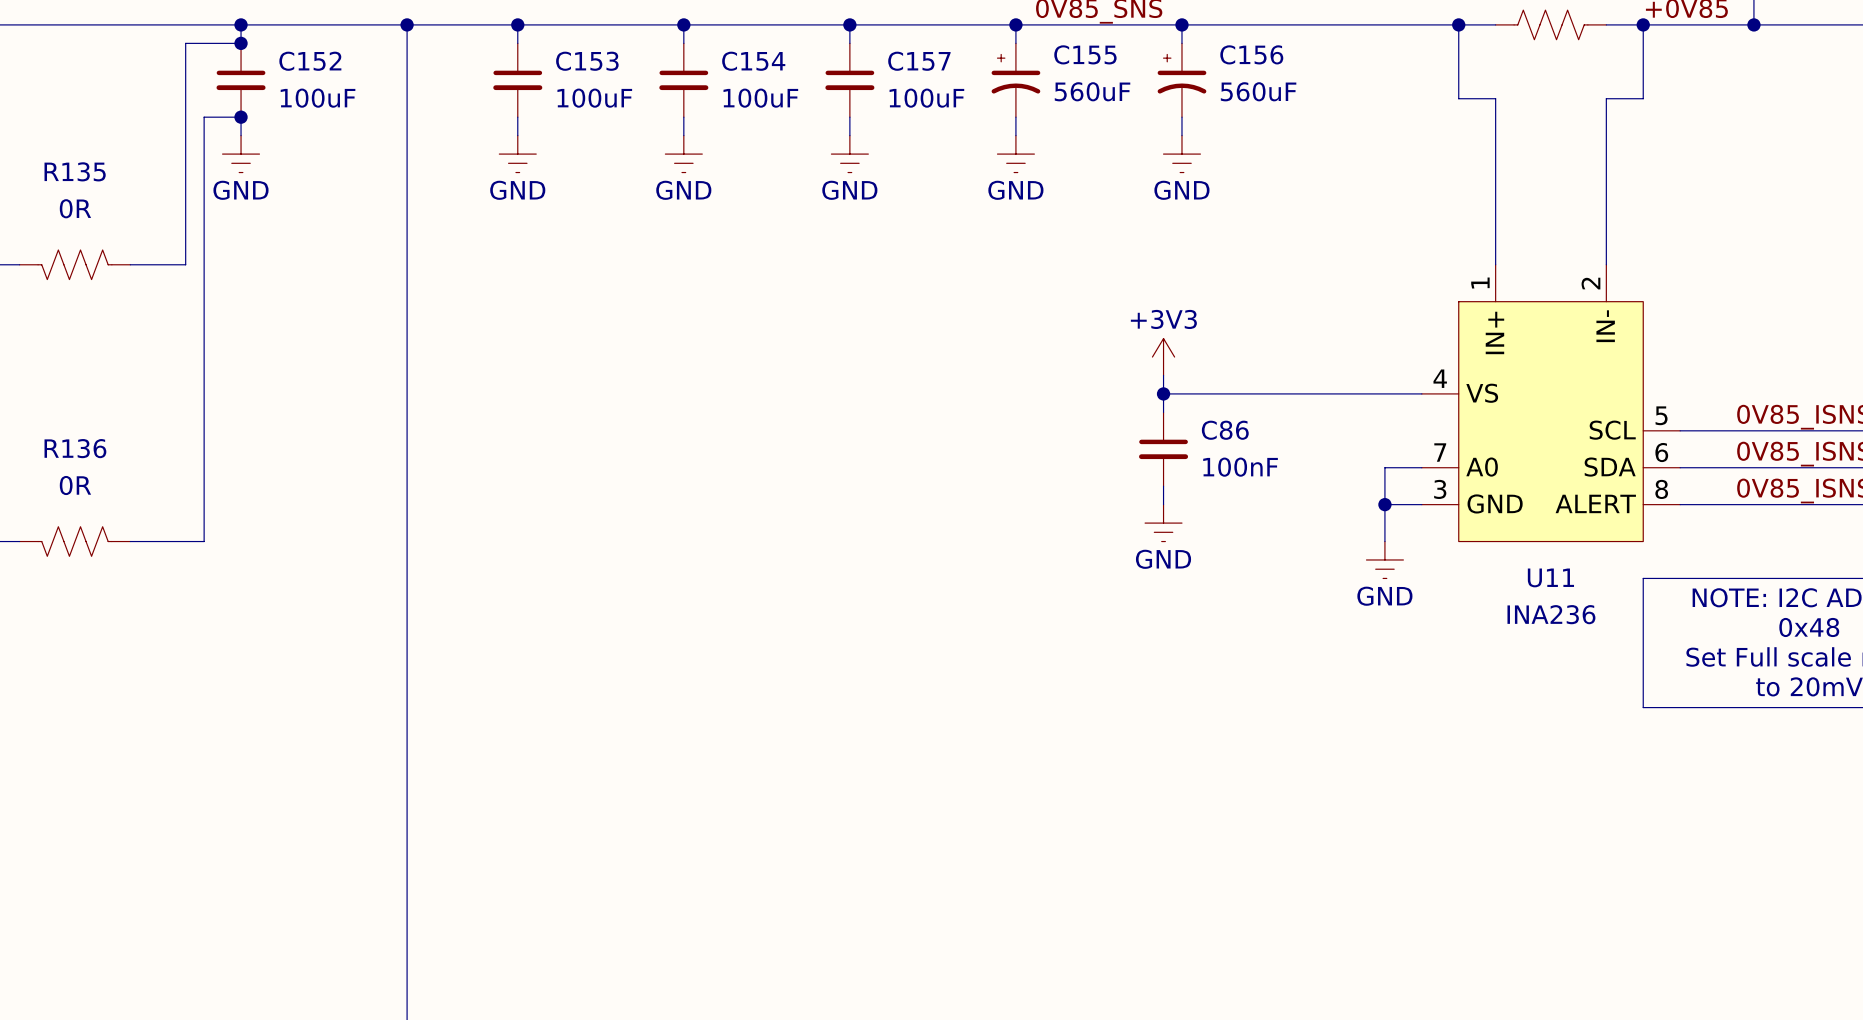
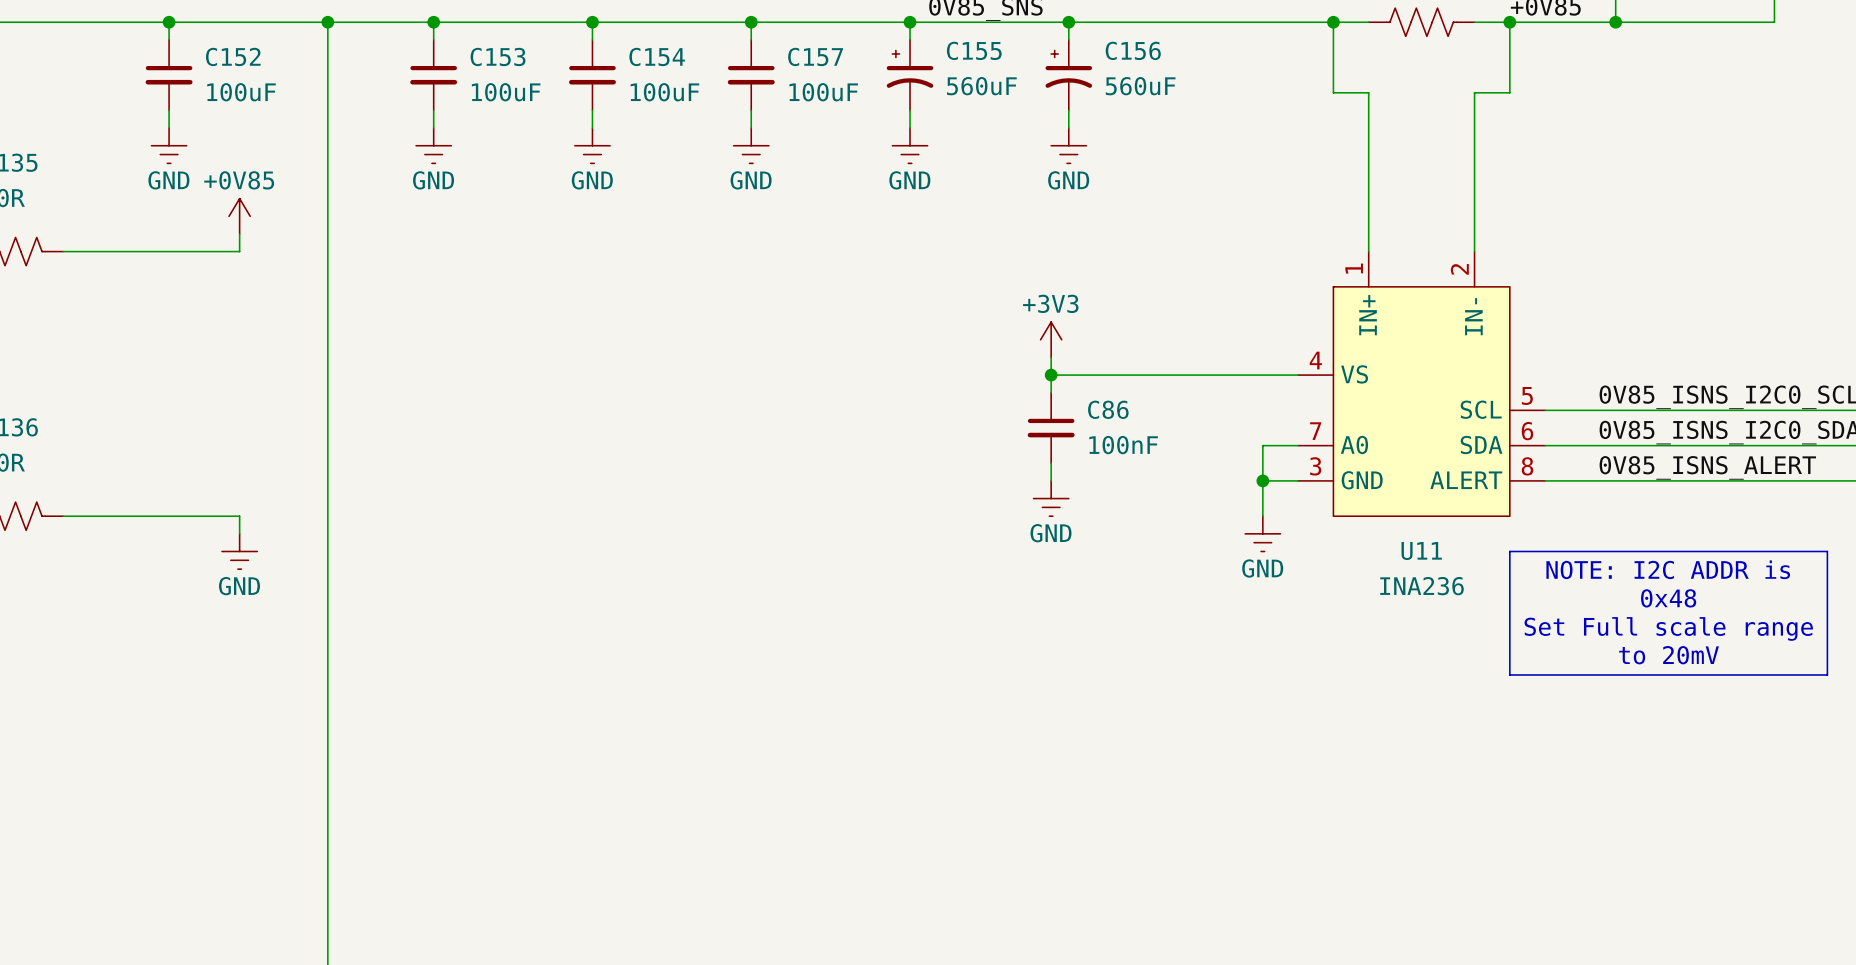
wire: (241, 43) (185, 43) (185, 264) -> (239, 233) (239, 251) (116, 251)
junction: (241, 43) -> none
wire: (241, 117) (204, 117) (204, 541) -> (239, 533) (239, 516) (133, 516)
junction: (241, 117) -> none
power symbol: none -> +0V85 (239, 216)
power symbol: none -> GND (239, 551)

